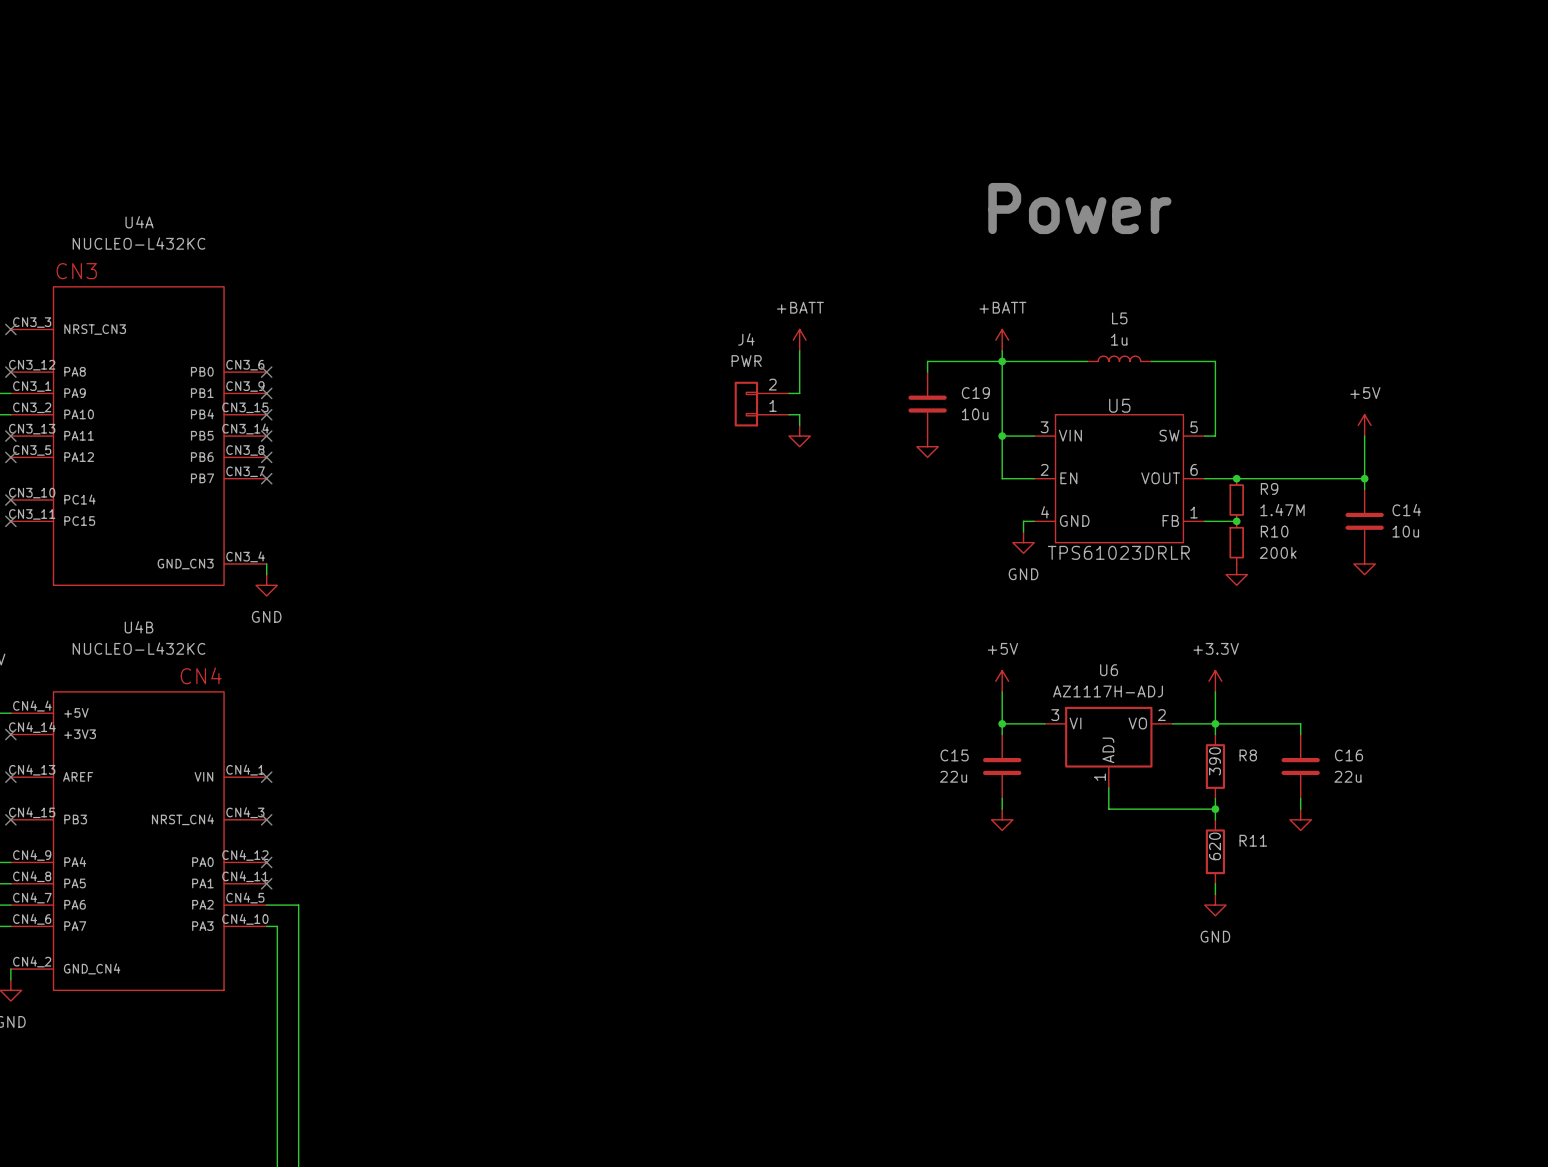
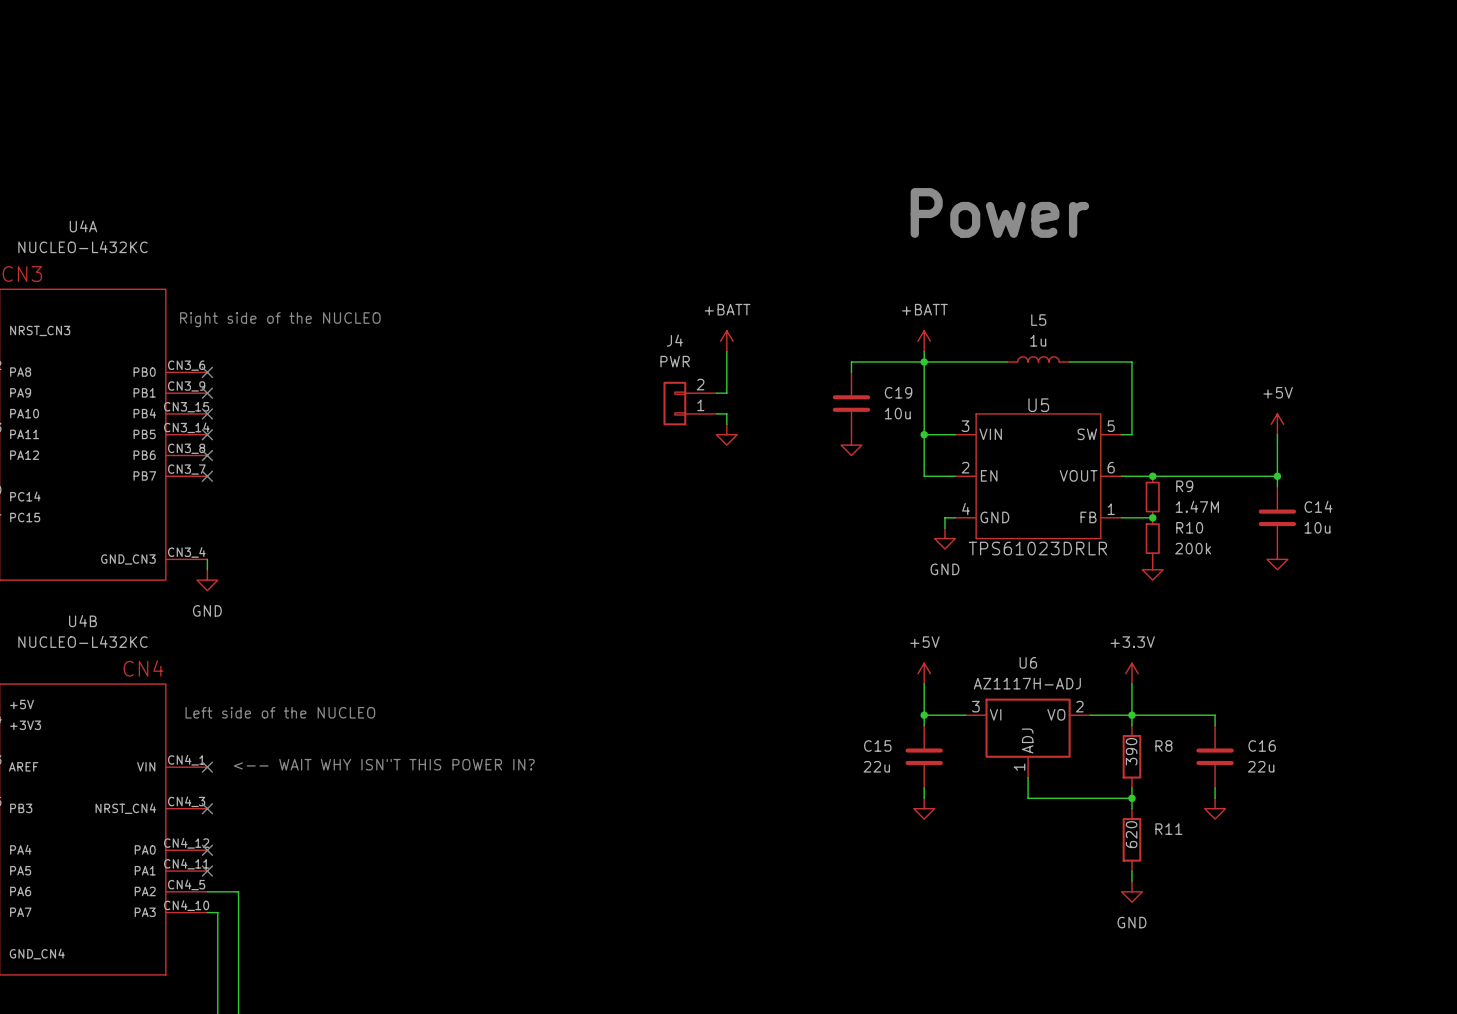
text: none -> Right side of the NUCLEO (280, 319)
text: none -> Left side of the NUCLEO (280, 712)
text: none -> <-- WAIT WHY ISN"T THIS POWER IN? (384, 764)

